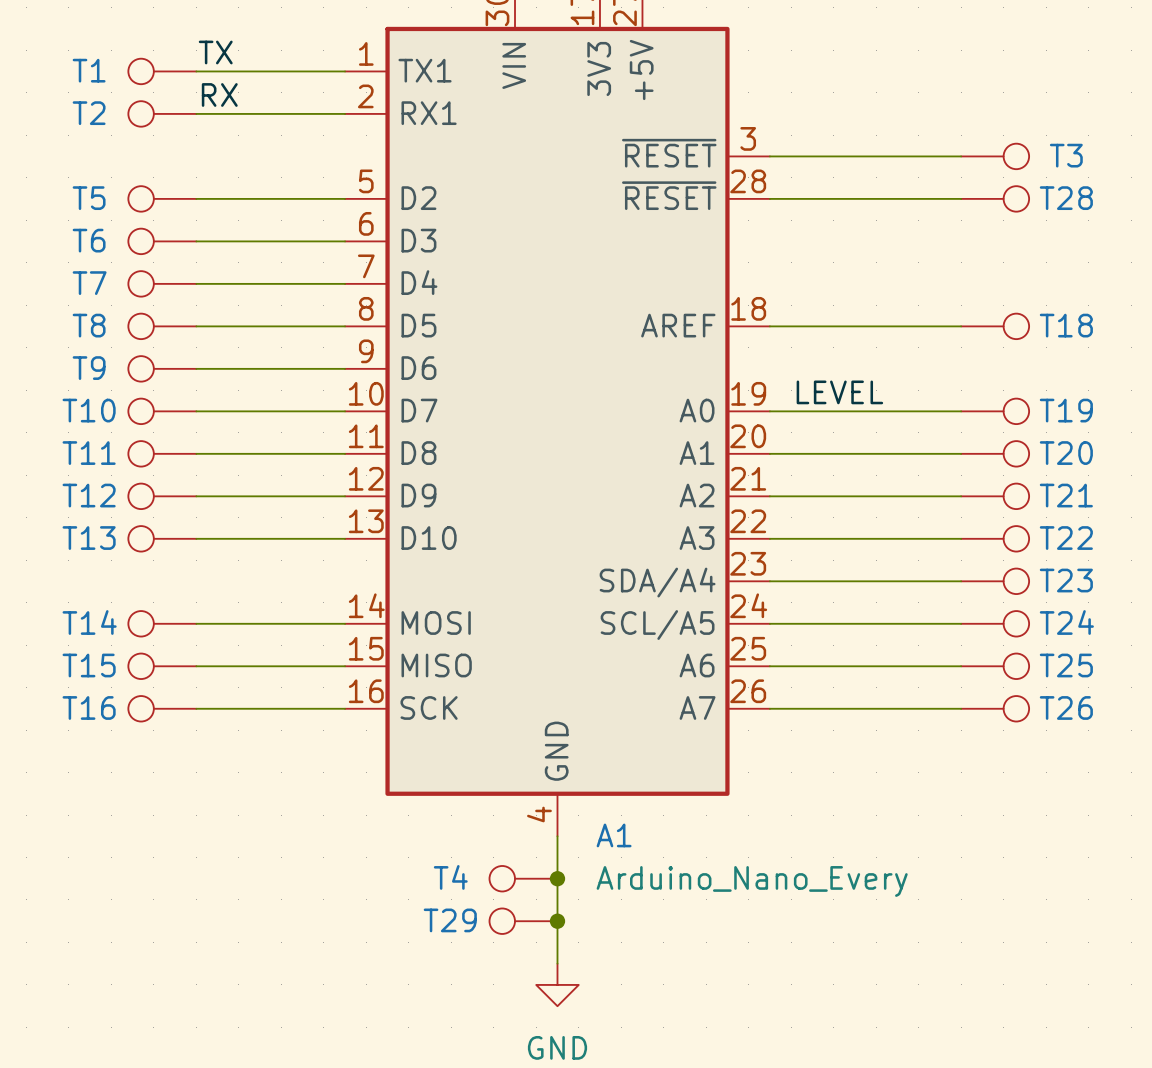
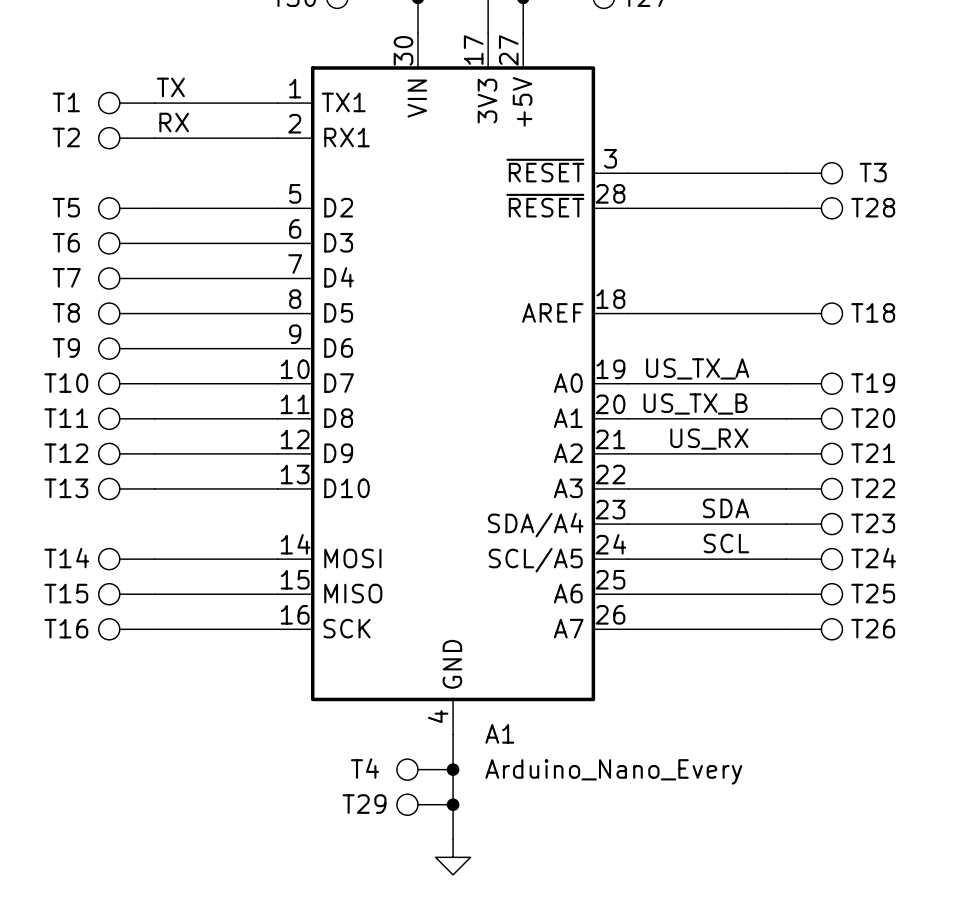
label: LEVEL (839, 392) -> none
label: none -> US_TX_A (697, 368)
label: none -> US_TX_B (695, 403)
label: none -> US_RX (709, 439)
label: none -> SDA (726, 508)
label: none -> SCL (726, 543)

